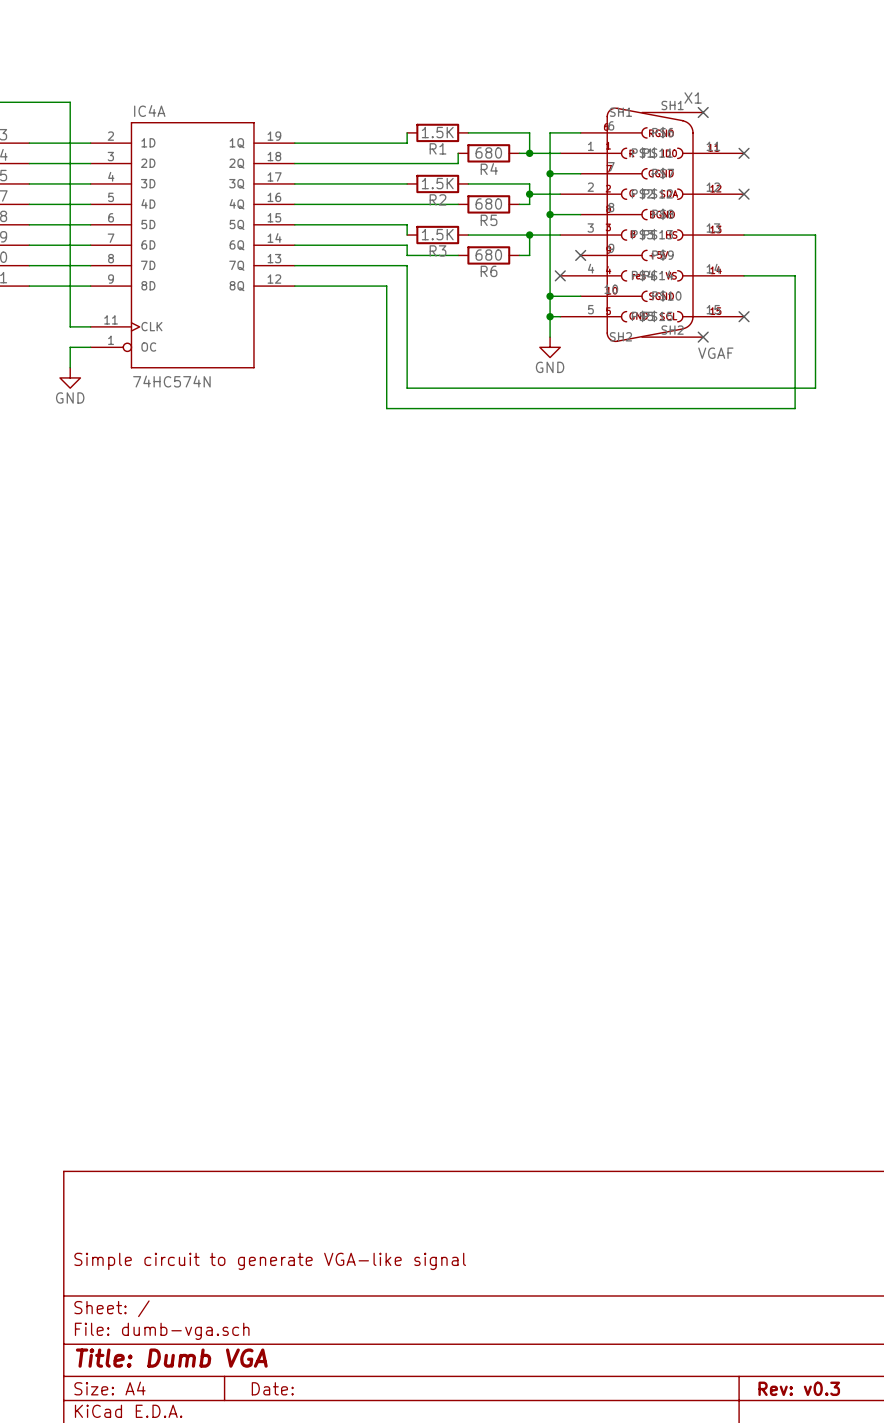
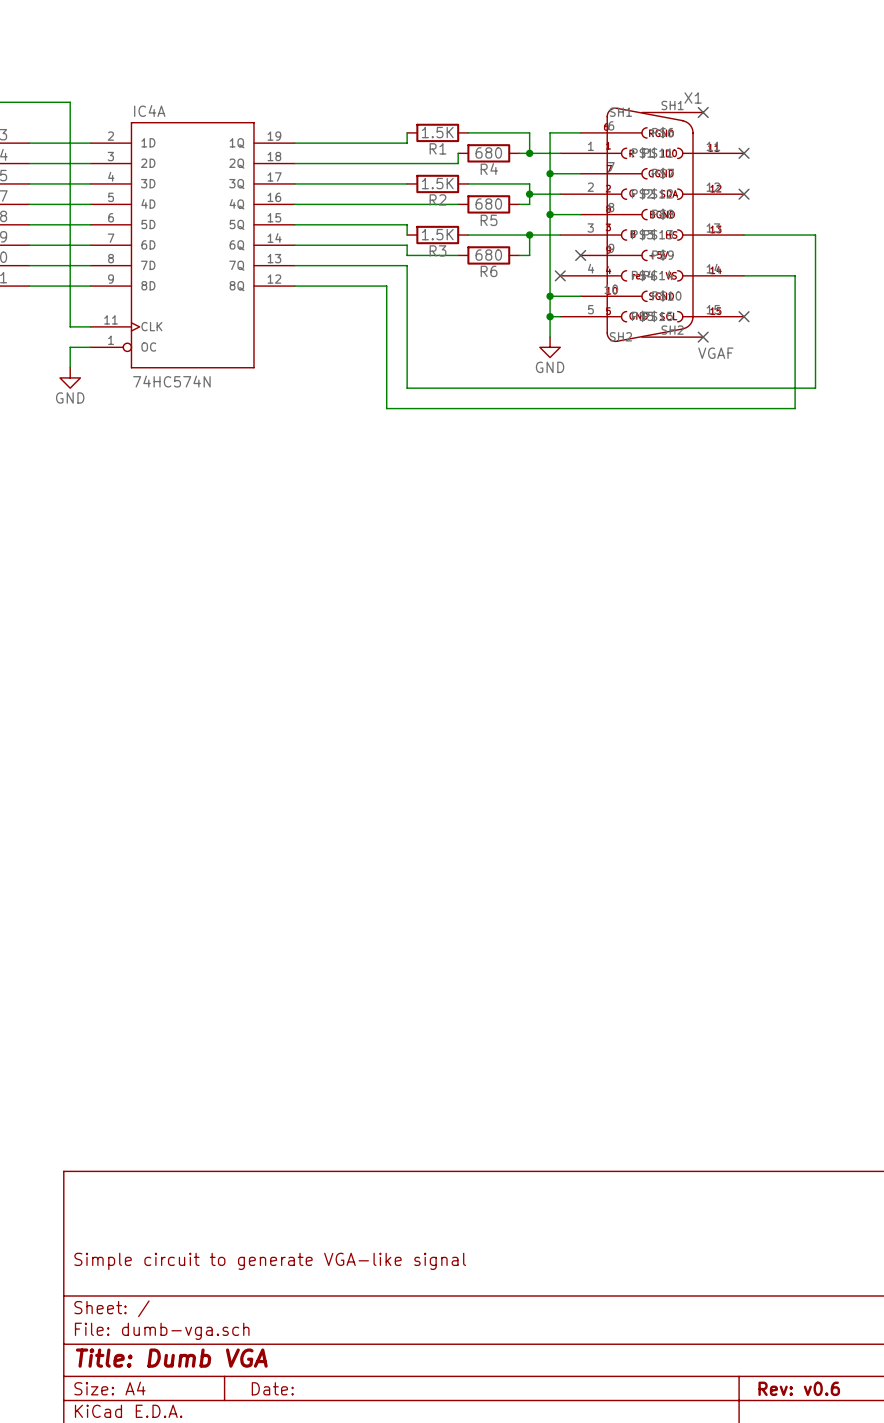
title block: Rev: v0.3 (799, 1388) -> Rev: v0.6 (799, 1388)

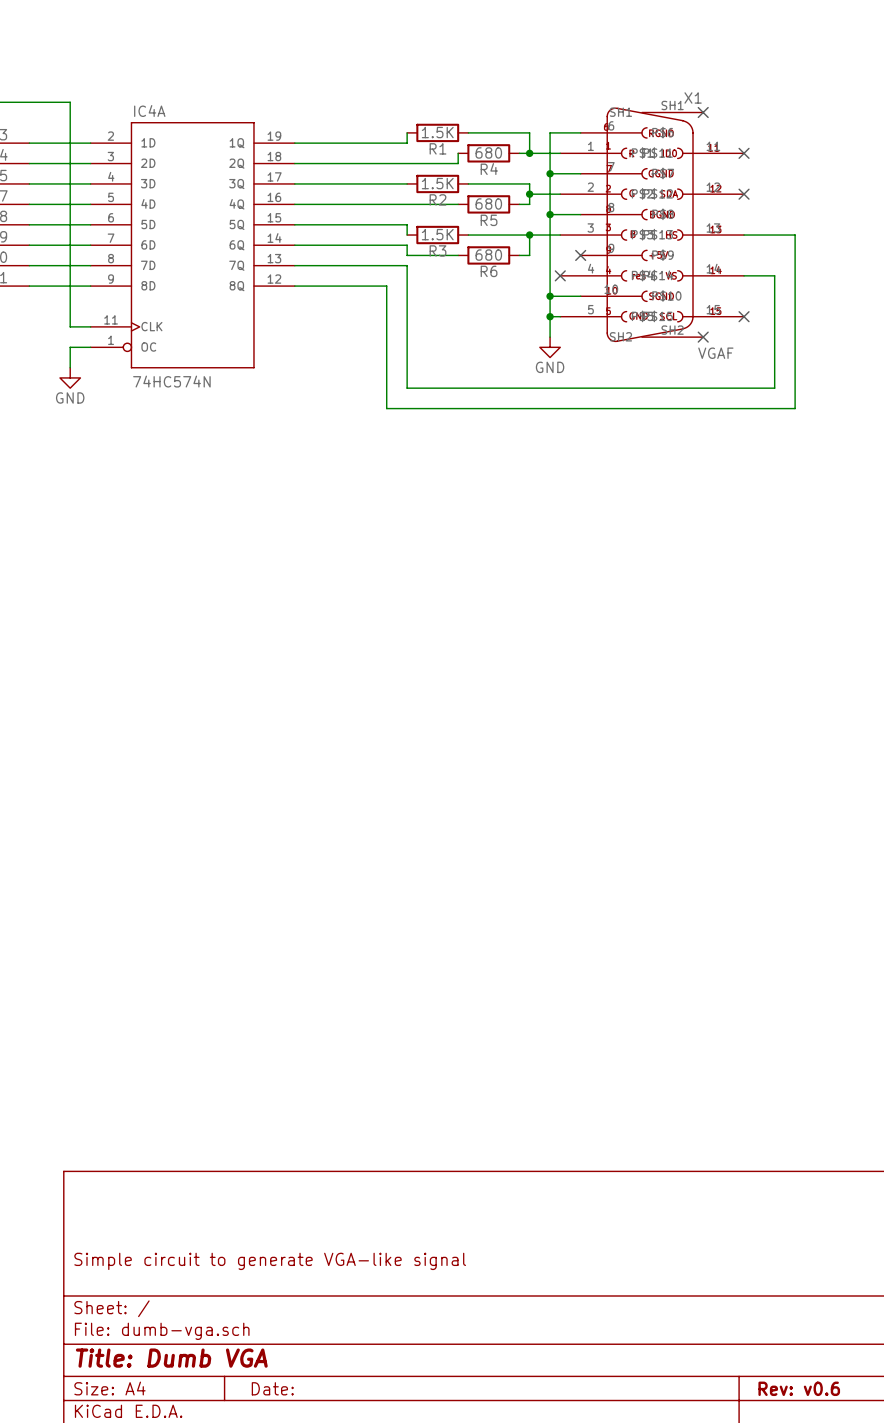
wire: (795, 235) (815, 235) (815, 388) (774, 388) -> (774, 275) (774, 388)
wire: (774, 275) (795, 275) -> (795, 235) (795, 275)

